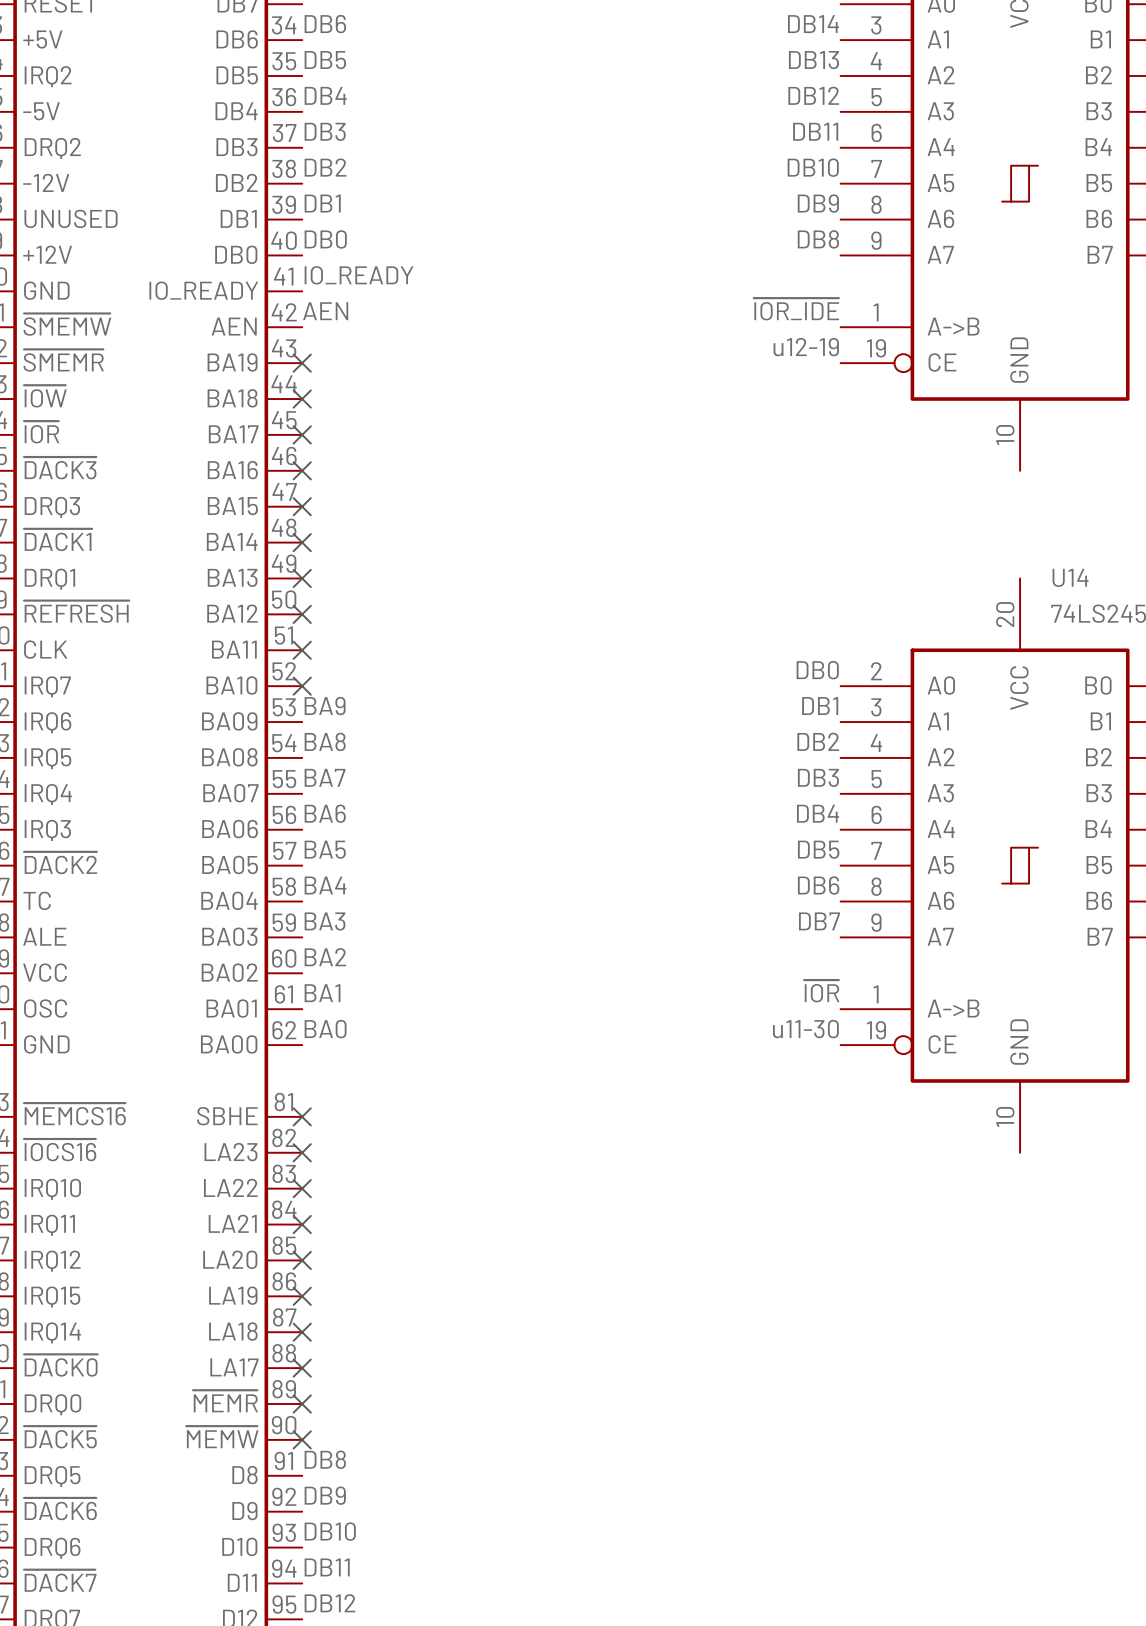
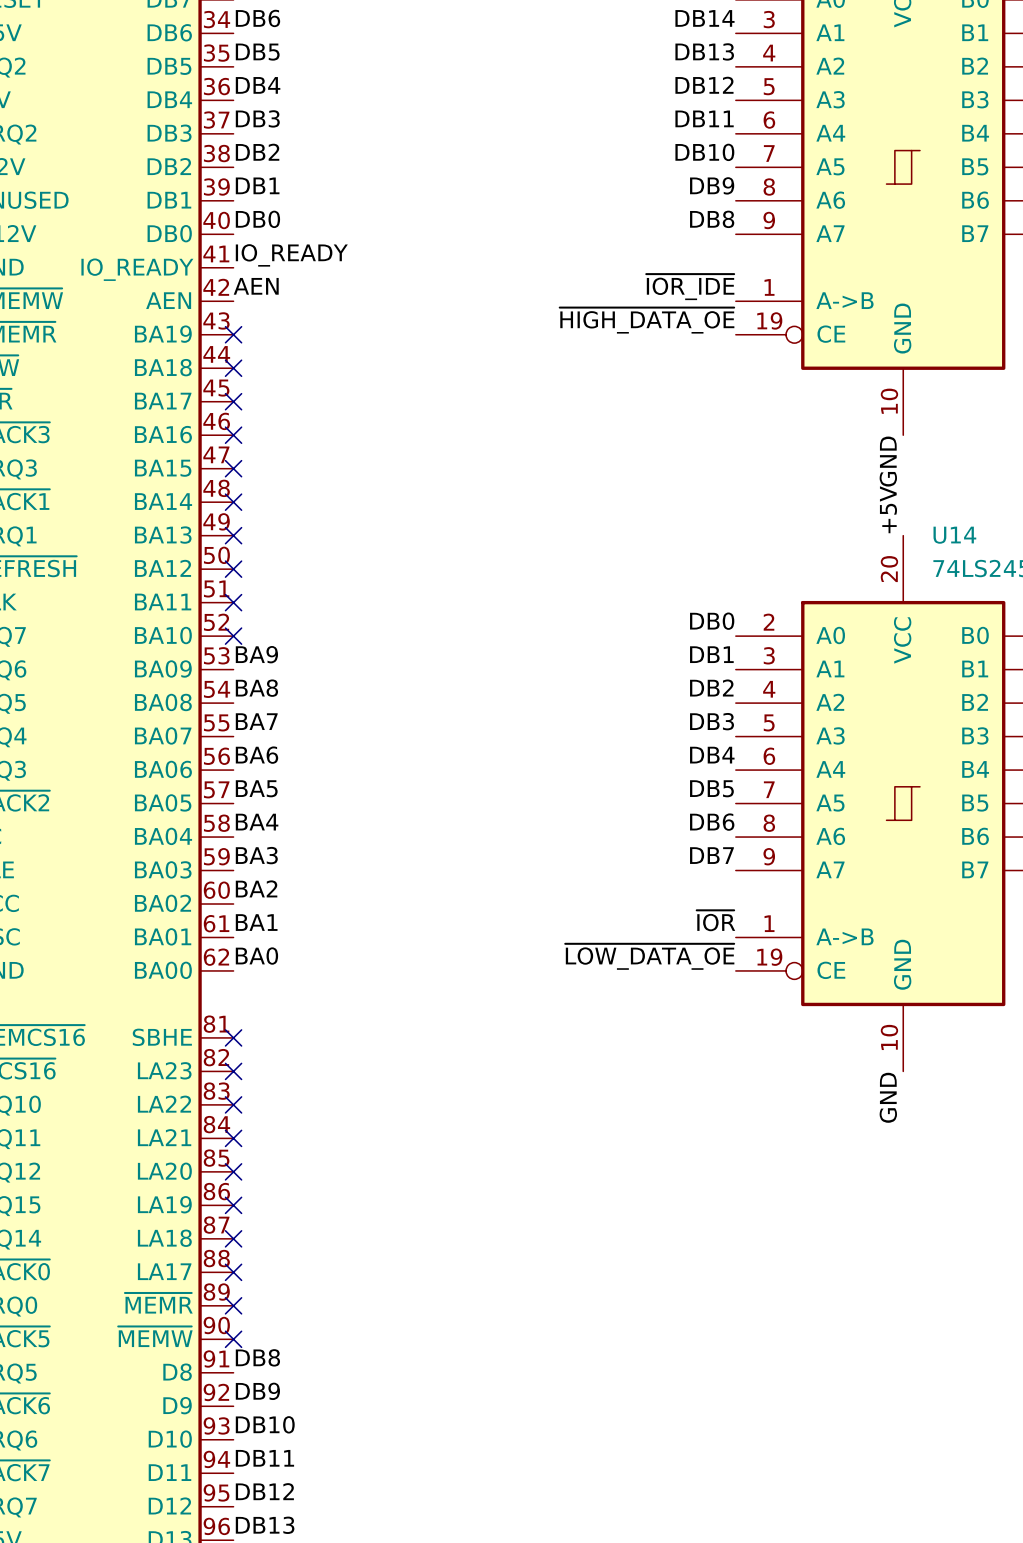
label: u12-19 (806, 347) -> ~{HIGH_DATA_OE} (647, 320)
label: none -> GND (888, 461)
label: none -> +5V (888, 509)
label: u11-30 (805, 1029) -> ~{LOW_DATA_OE} (649, 956)
label: none -> GND (888, 1097)

